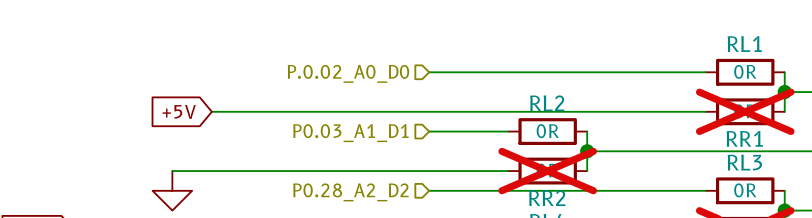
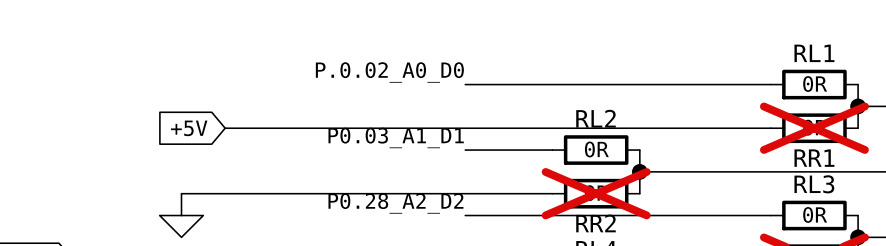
label: none -> P.0.02_A0_D0 (389, 72)
hierarchical label: P.0.02_A0_D0 (348, 73) -> none
label: none -> P0.03_A1_D1 (396, 137)
hierarchical label: P0.03_A1_D1 (350, 133) -> none
label: none -> P0.28_A2_D2 (395, 203)
hierarchical label: P0.28_A2_D2 (350, 192) -> none

